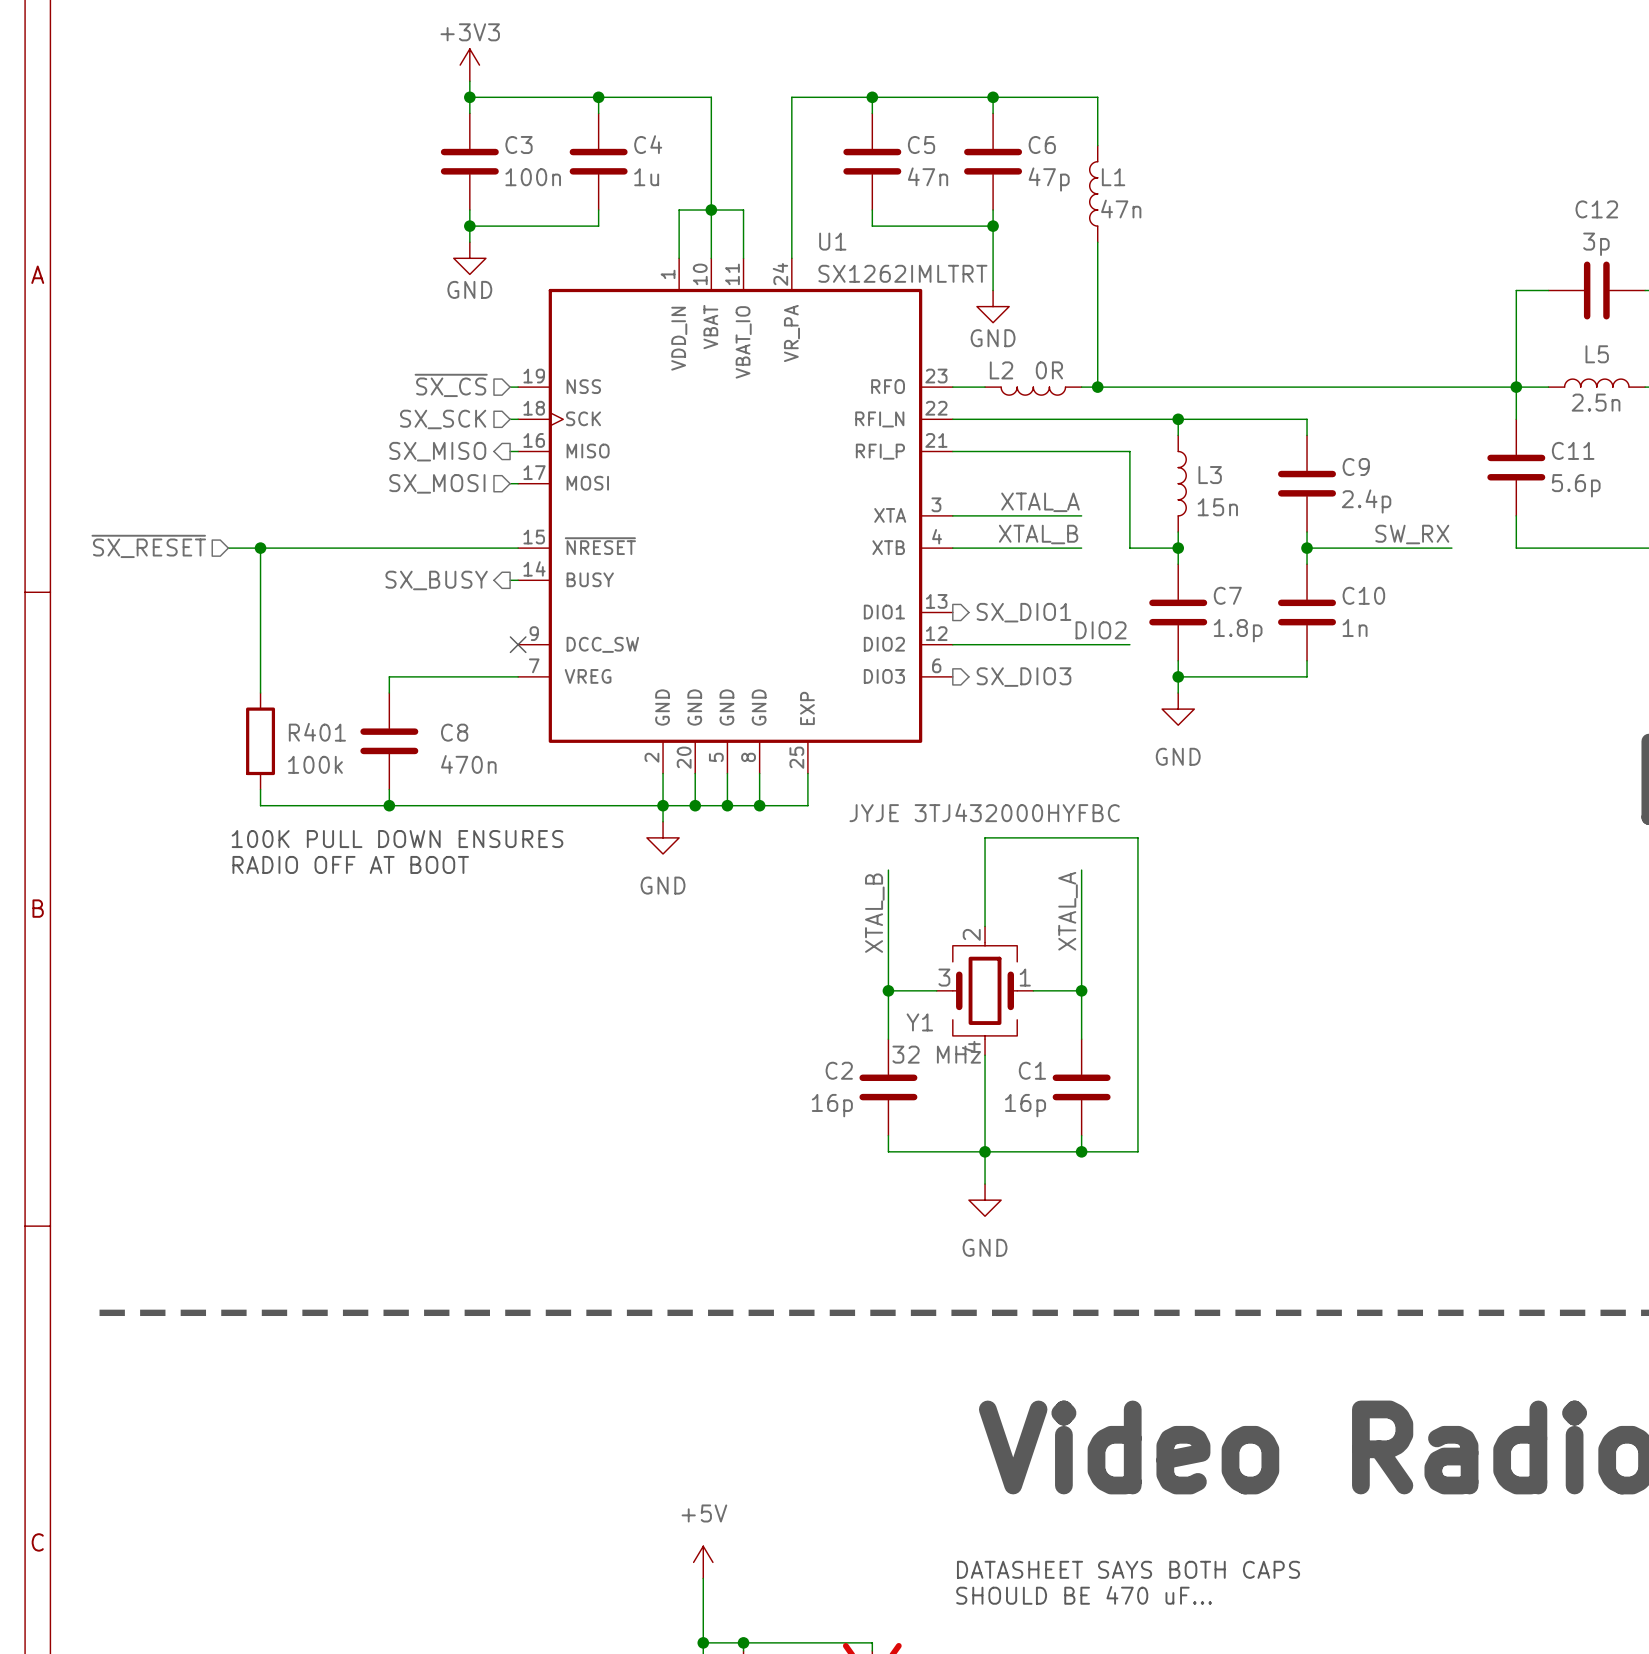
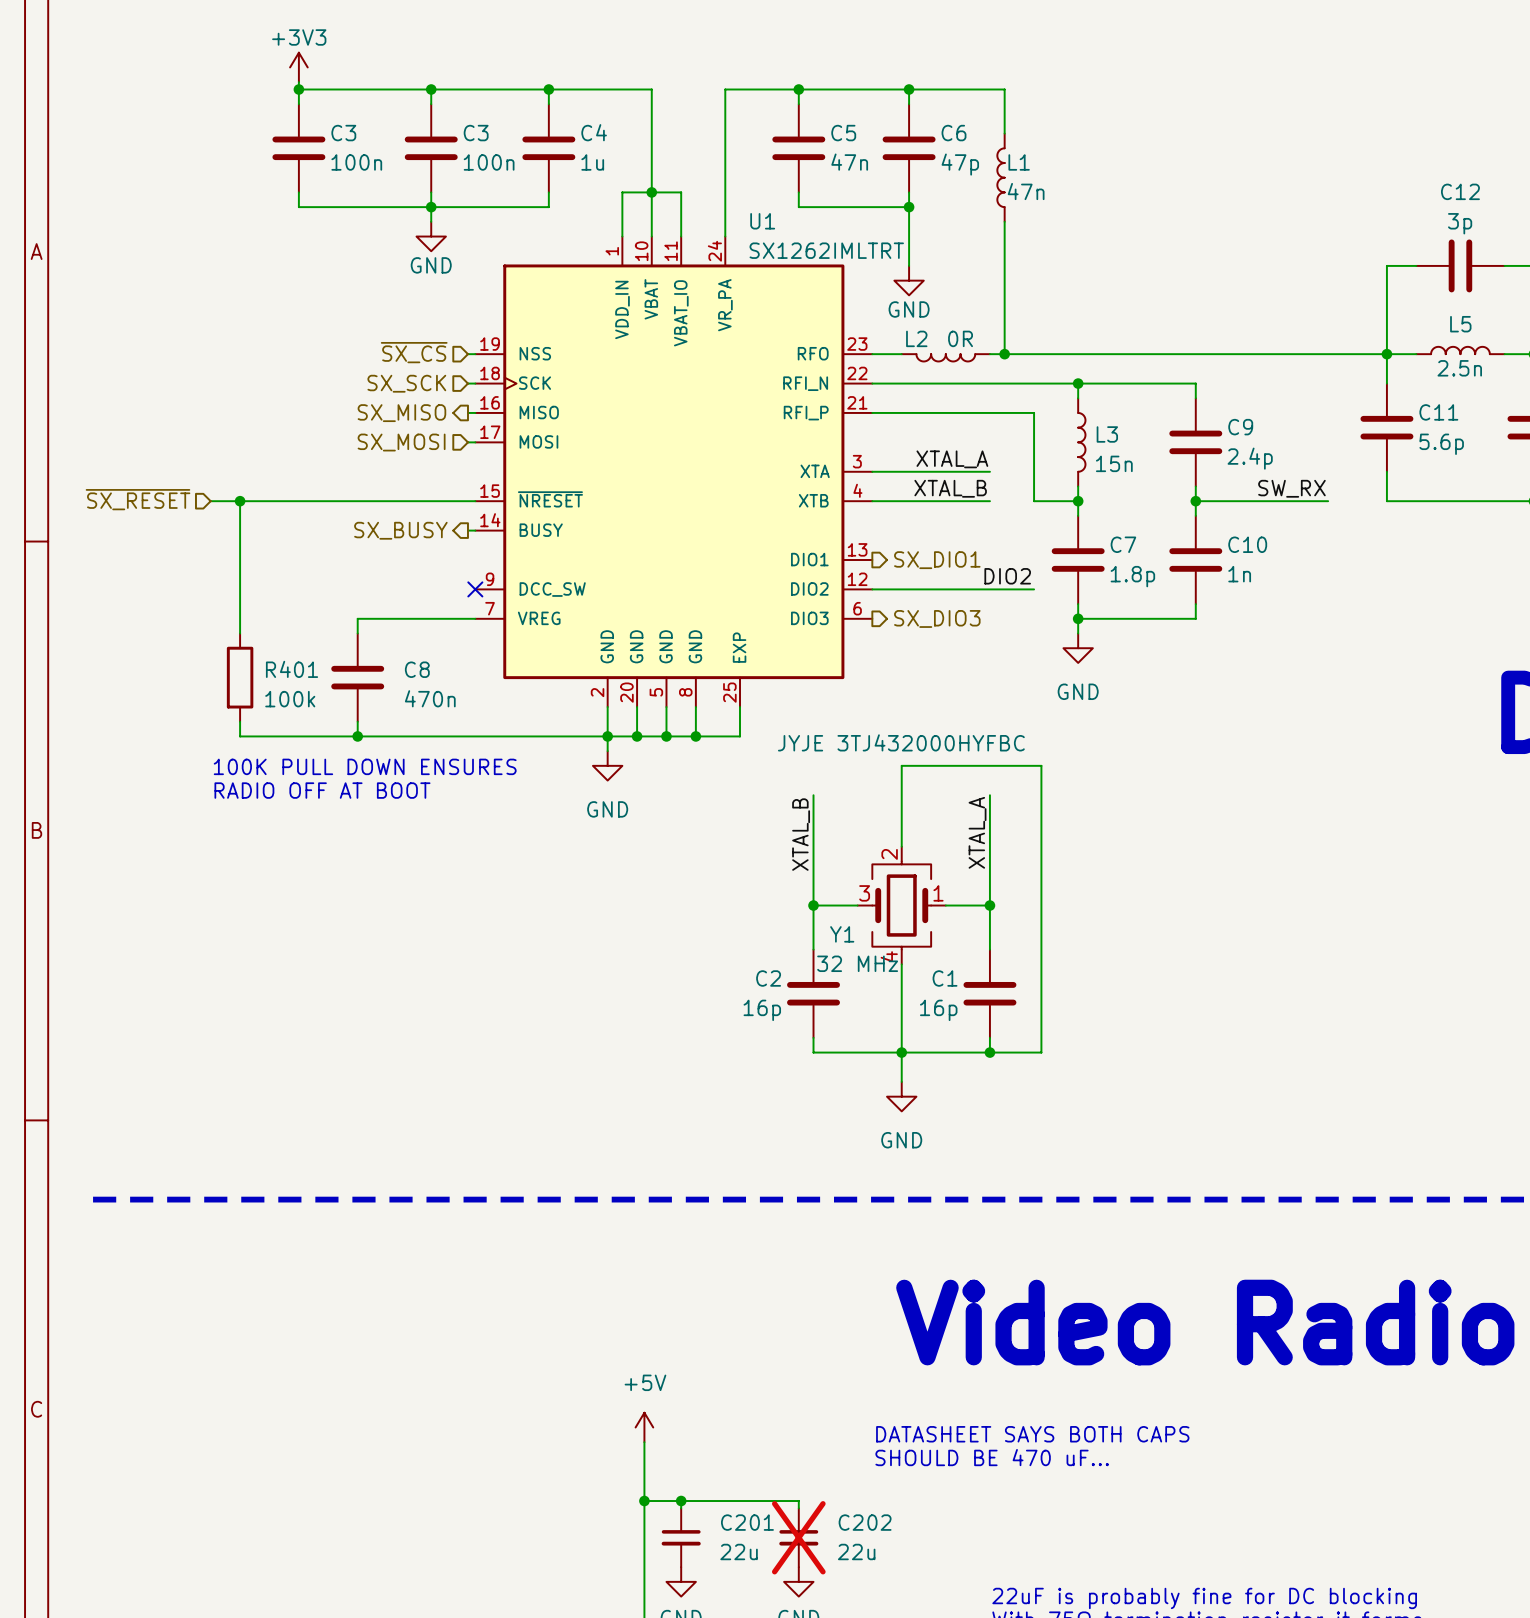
power symbol position: +3V3 (469, 65) -> +3V3 (298, 67)
wire: (469, 81) (469, 97) -> (298, 89) (431, 89)
wire: none -> (298, 82) (298, 104)
junction: none -> (298, 89)
C3: none -> 100n (298, 148)
wire: none -> (298, 192) (298, 207) (431, 207)

